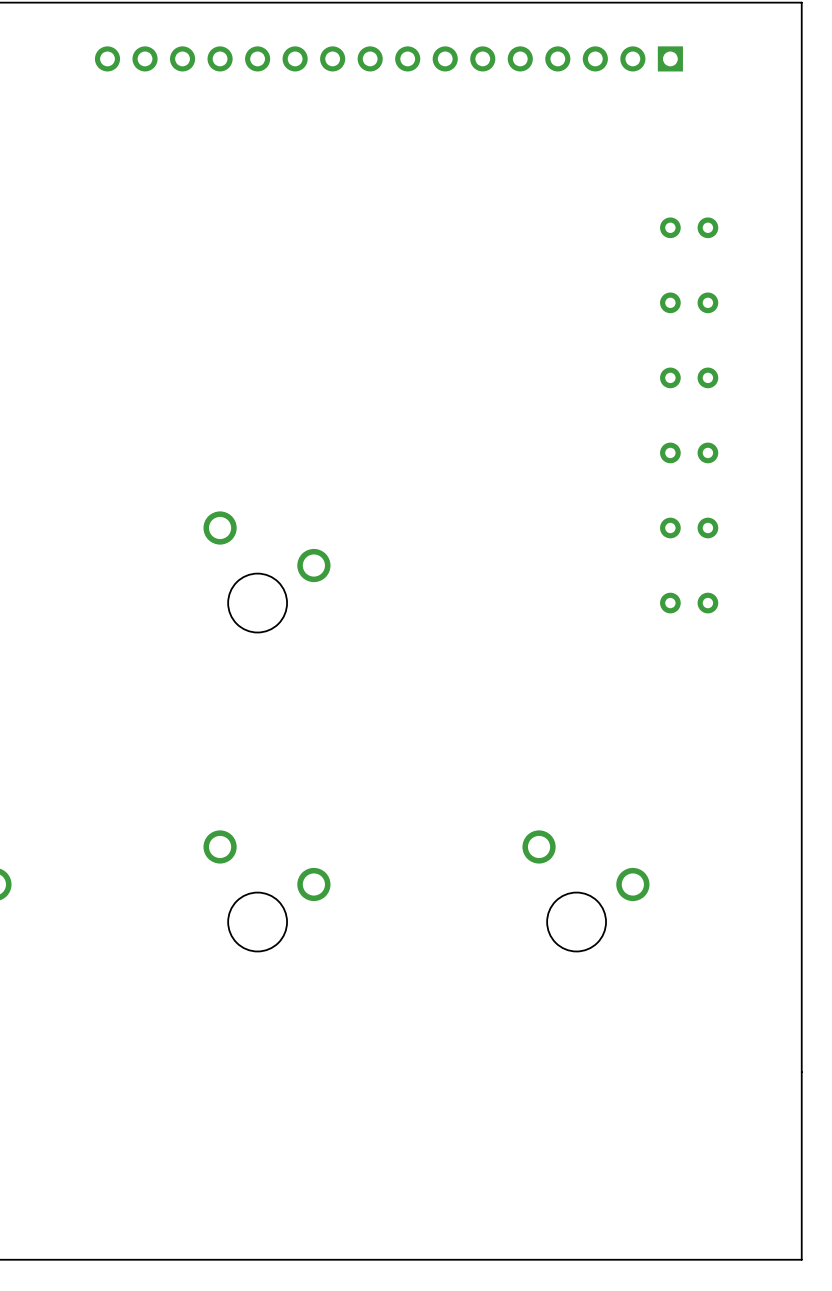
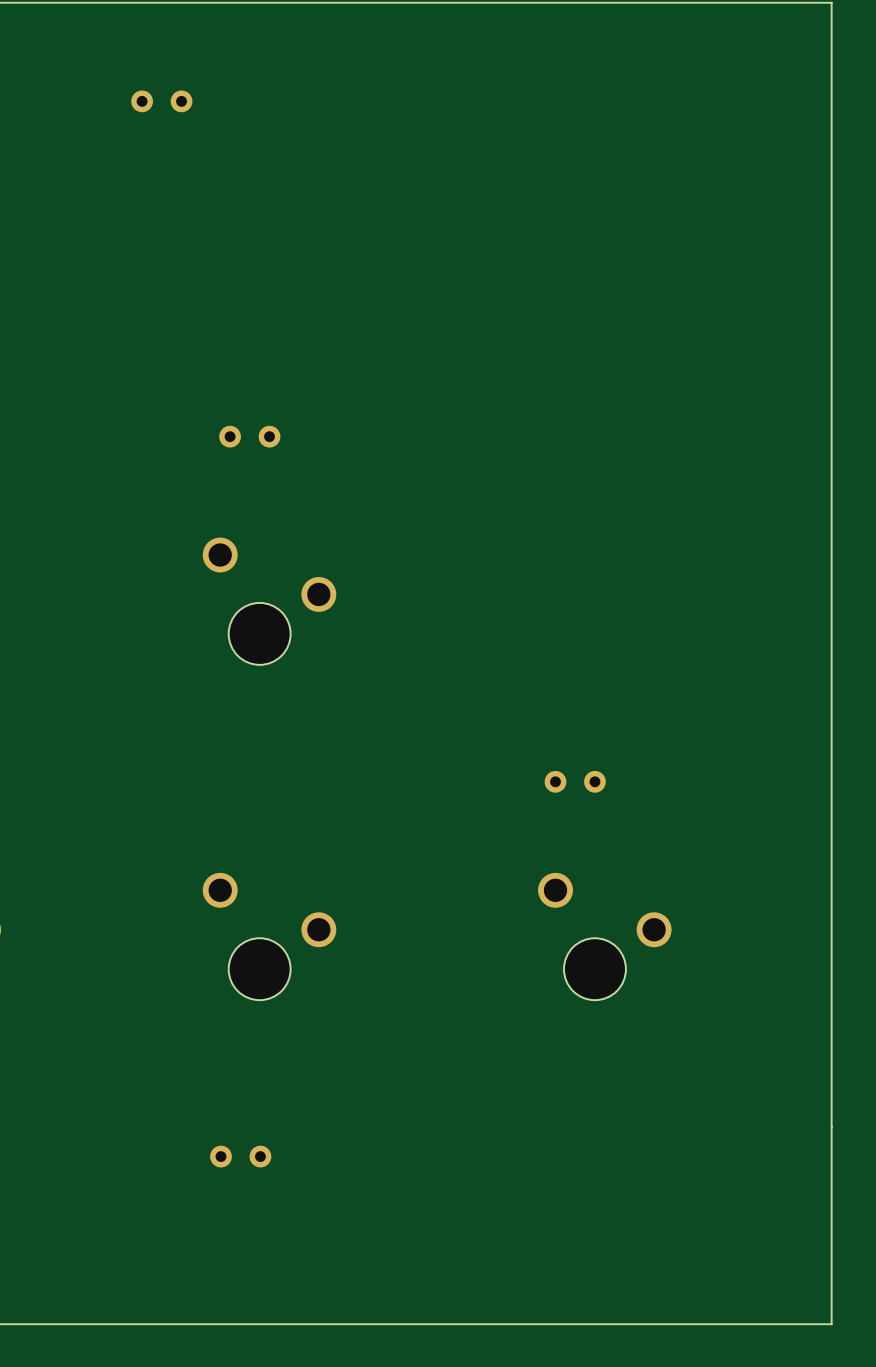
part: (388, 58) -> none
part: none -> (161, 101)
part: (689, 227) -> none
part: (689, 302) -> none
part: (689, 377) -> none
part: none -> (249, 436)
part: (689, 452) -> none
part: (689, 528) -> none
part: (689, 603) -> none
part: none -> (575, 781)
part: none -> (240, 1156)

